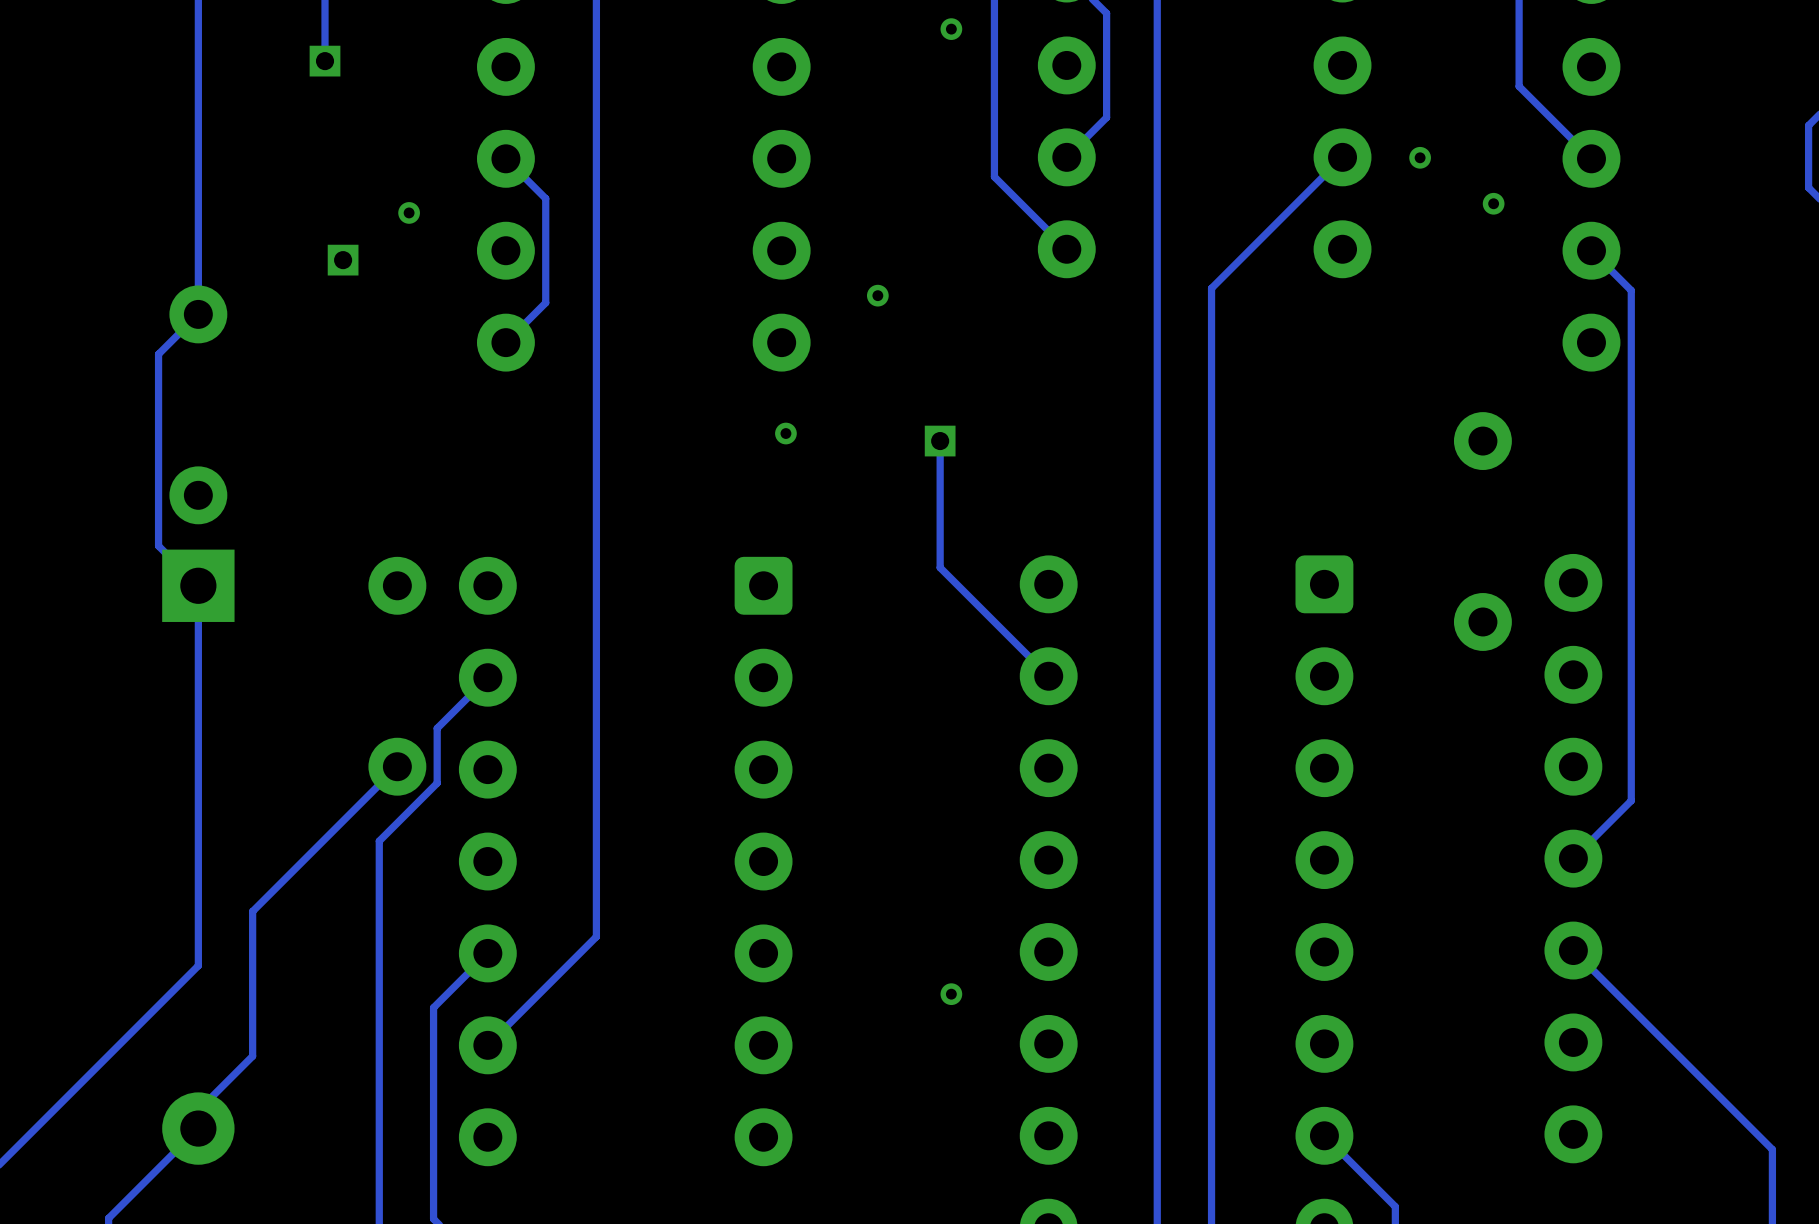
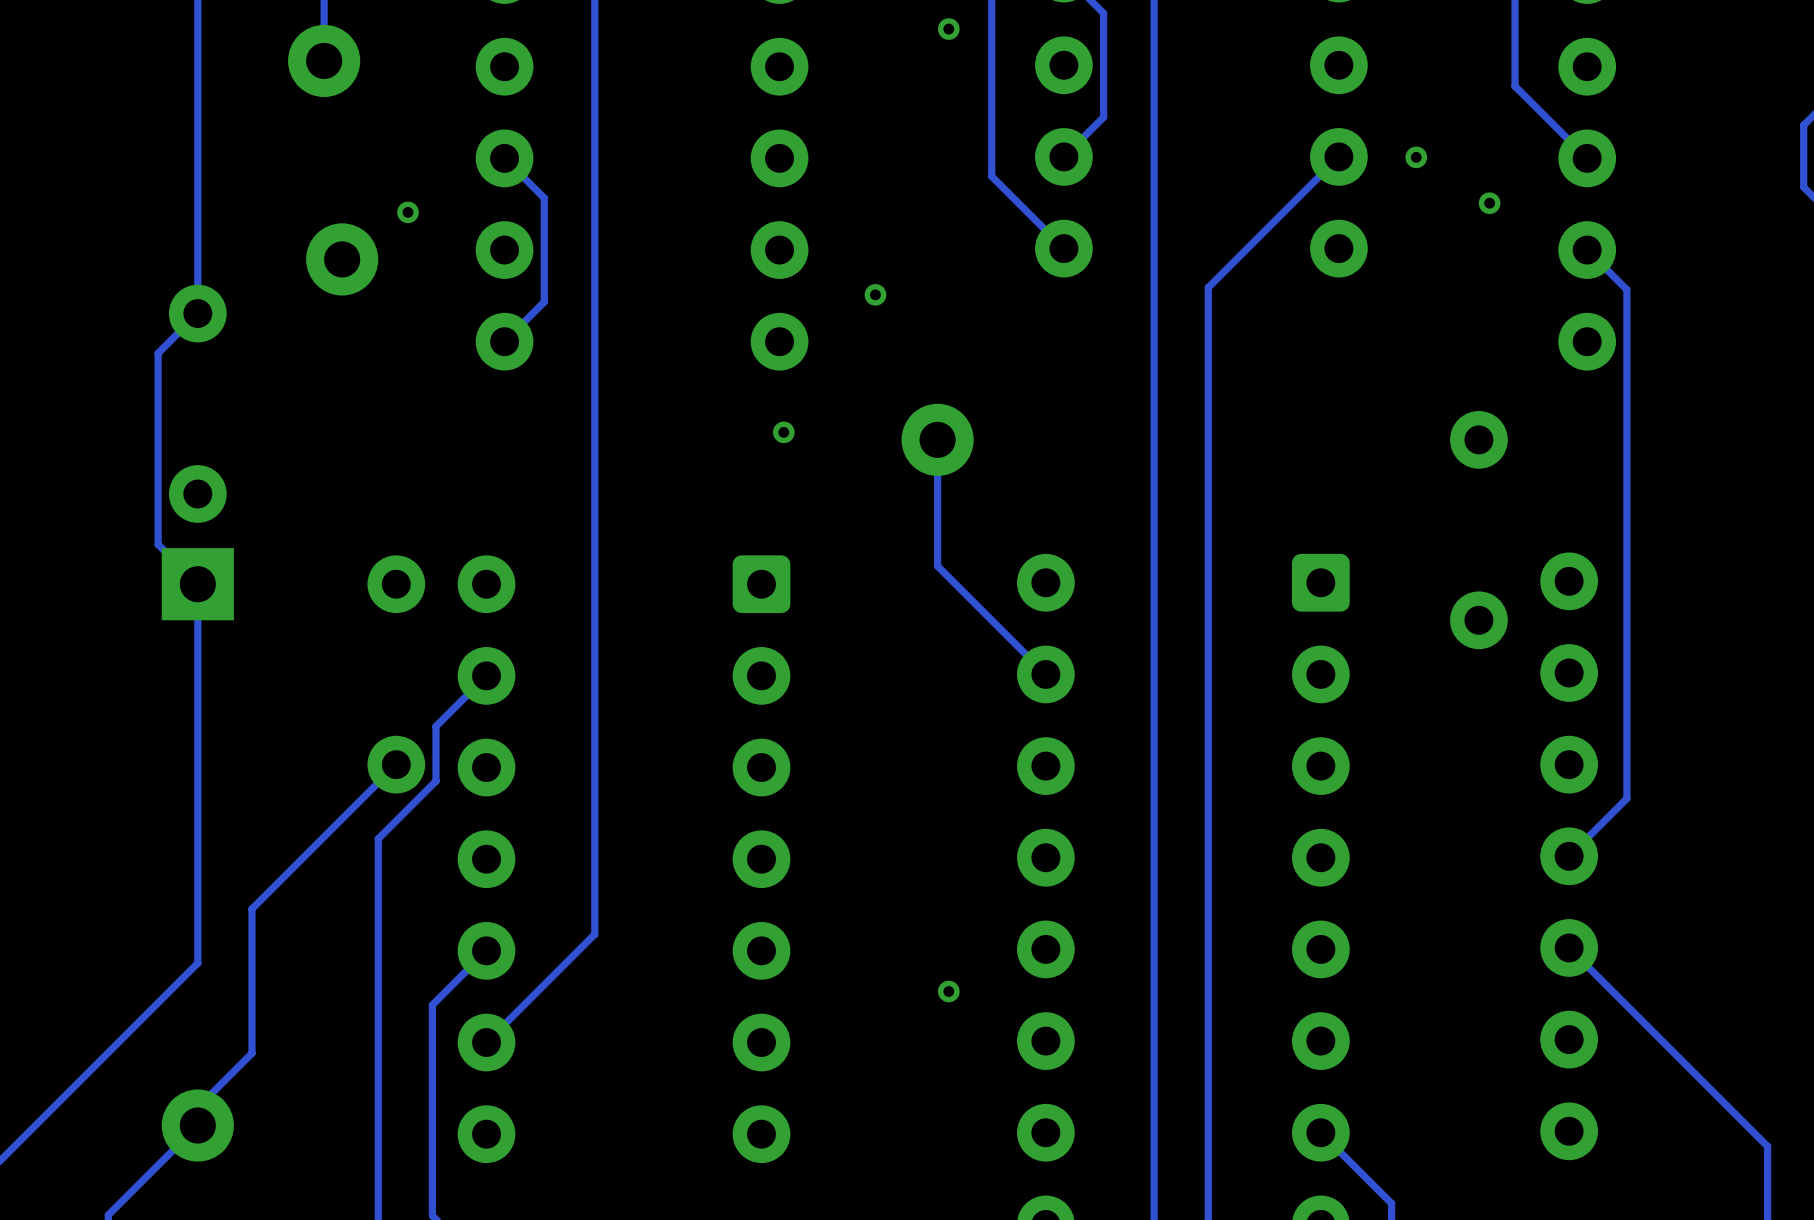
part footprint: [309, 45, 341, 77] -> [288, 24, 361, 98]
part footprint: [327, 244, 359, 276] -> [306, 223, 379, 296]
part footprint: [924, 425, 956, 457] -> [901, 403, 974, 476]

